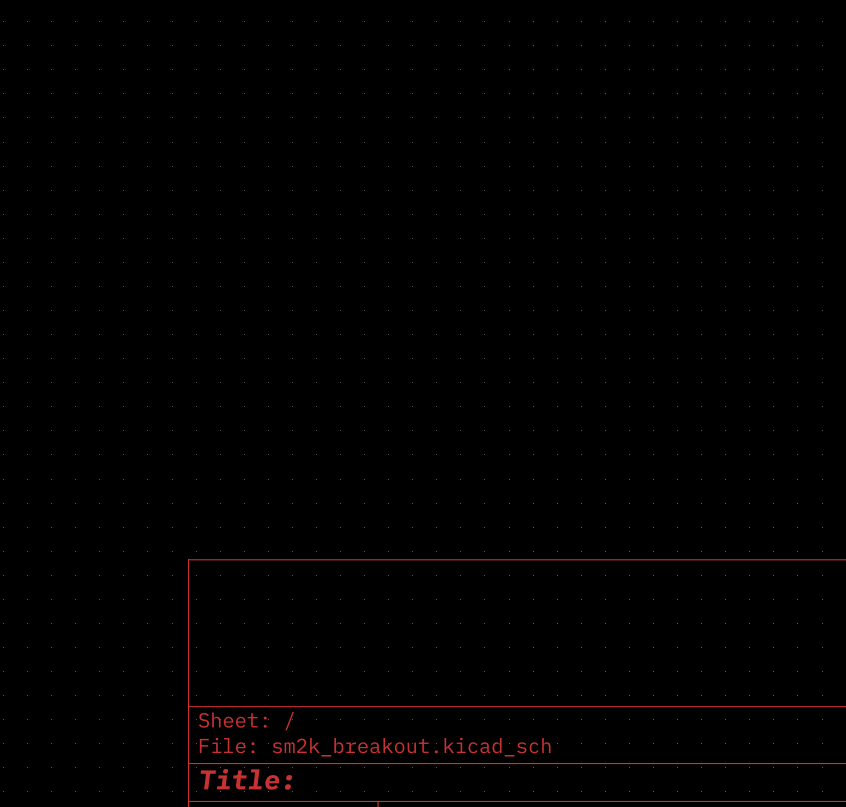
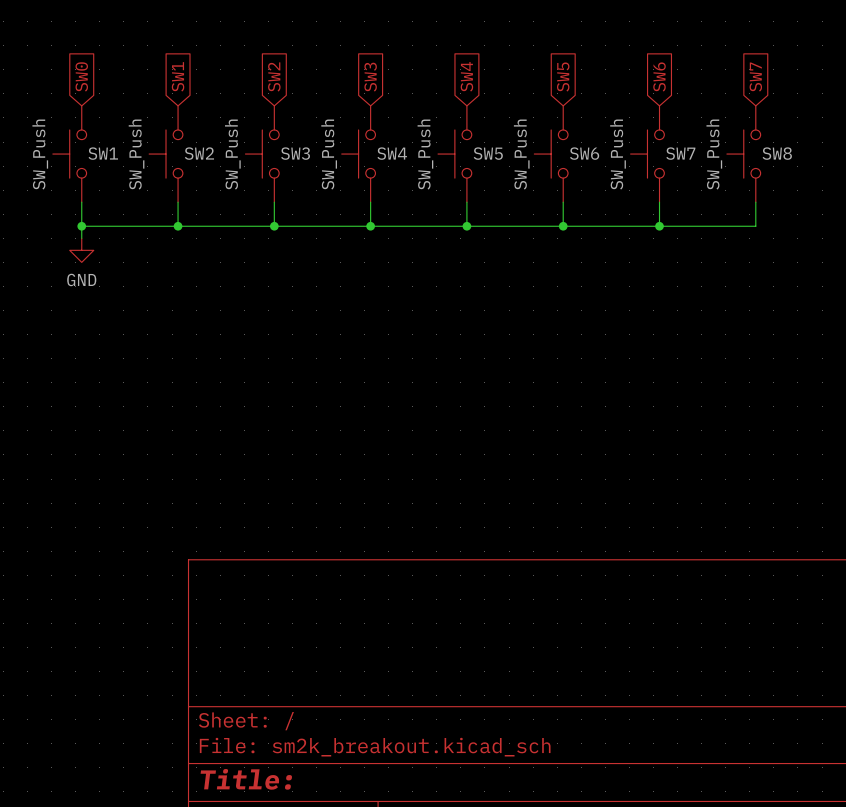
global label: none -> SW0 (81, 76)
global label: none -> SW1 (178, 76)
global label: none -> SW2 (274, 76)
global label: none -> SW4 (466, 76)
global label: none -> SW6 (659, 76)
global label: none -> SW3 (370, 77)
global label: none -> SW5 (563, 77)
global label: none -> SW7 (755, 77)
SW1: none -> SW_Push (69, 154)
SW2: none -> SW_Push (166, 154)
SW3: none -> SW_Push (262, 154)
SW4: none -> SW_Push (358, 154)
SW5: none -> SW_Push (454, 154)
SW6: none -> SW_Push (551, 154)
SW7: none -> SW_Push (647, 154)
SW8: none -> SW_Push (743, 154)
wire: none -> (81, 202) (81, 238)
wire: none -> (178, 202) (178, 226)
wire: none -> (274, 202) (274, 226)
wire: none -> (370, 202) (370, 226)
wire: none -> (466, 202) (466, 226)
wire: none -> (563, 202) (563, 226)
wire: none -> (659, 202) (659, 226)
wire: none -> (755, 202) (755, 226) (81, 226)
junction: none -> (81, 226)
junction: none -> (178, 226)
junction: none -> (274, 226)
junction: none -> (370, 226)
junction: none -> (466, 226)
junction: none -> (563, 226)
junction: none -> (659, 226)
power symbol: none -> GND (81, 250)

